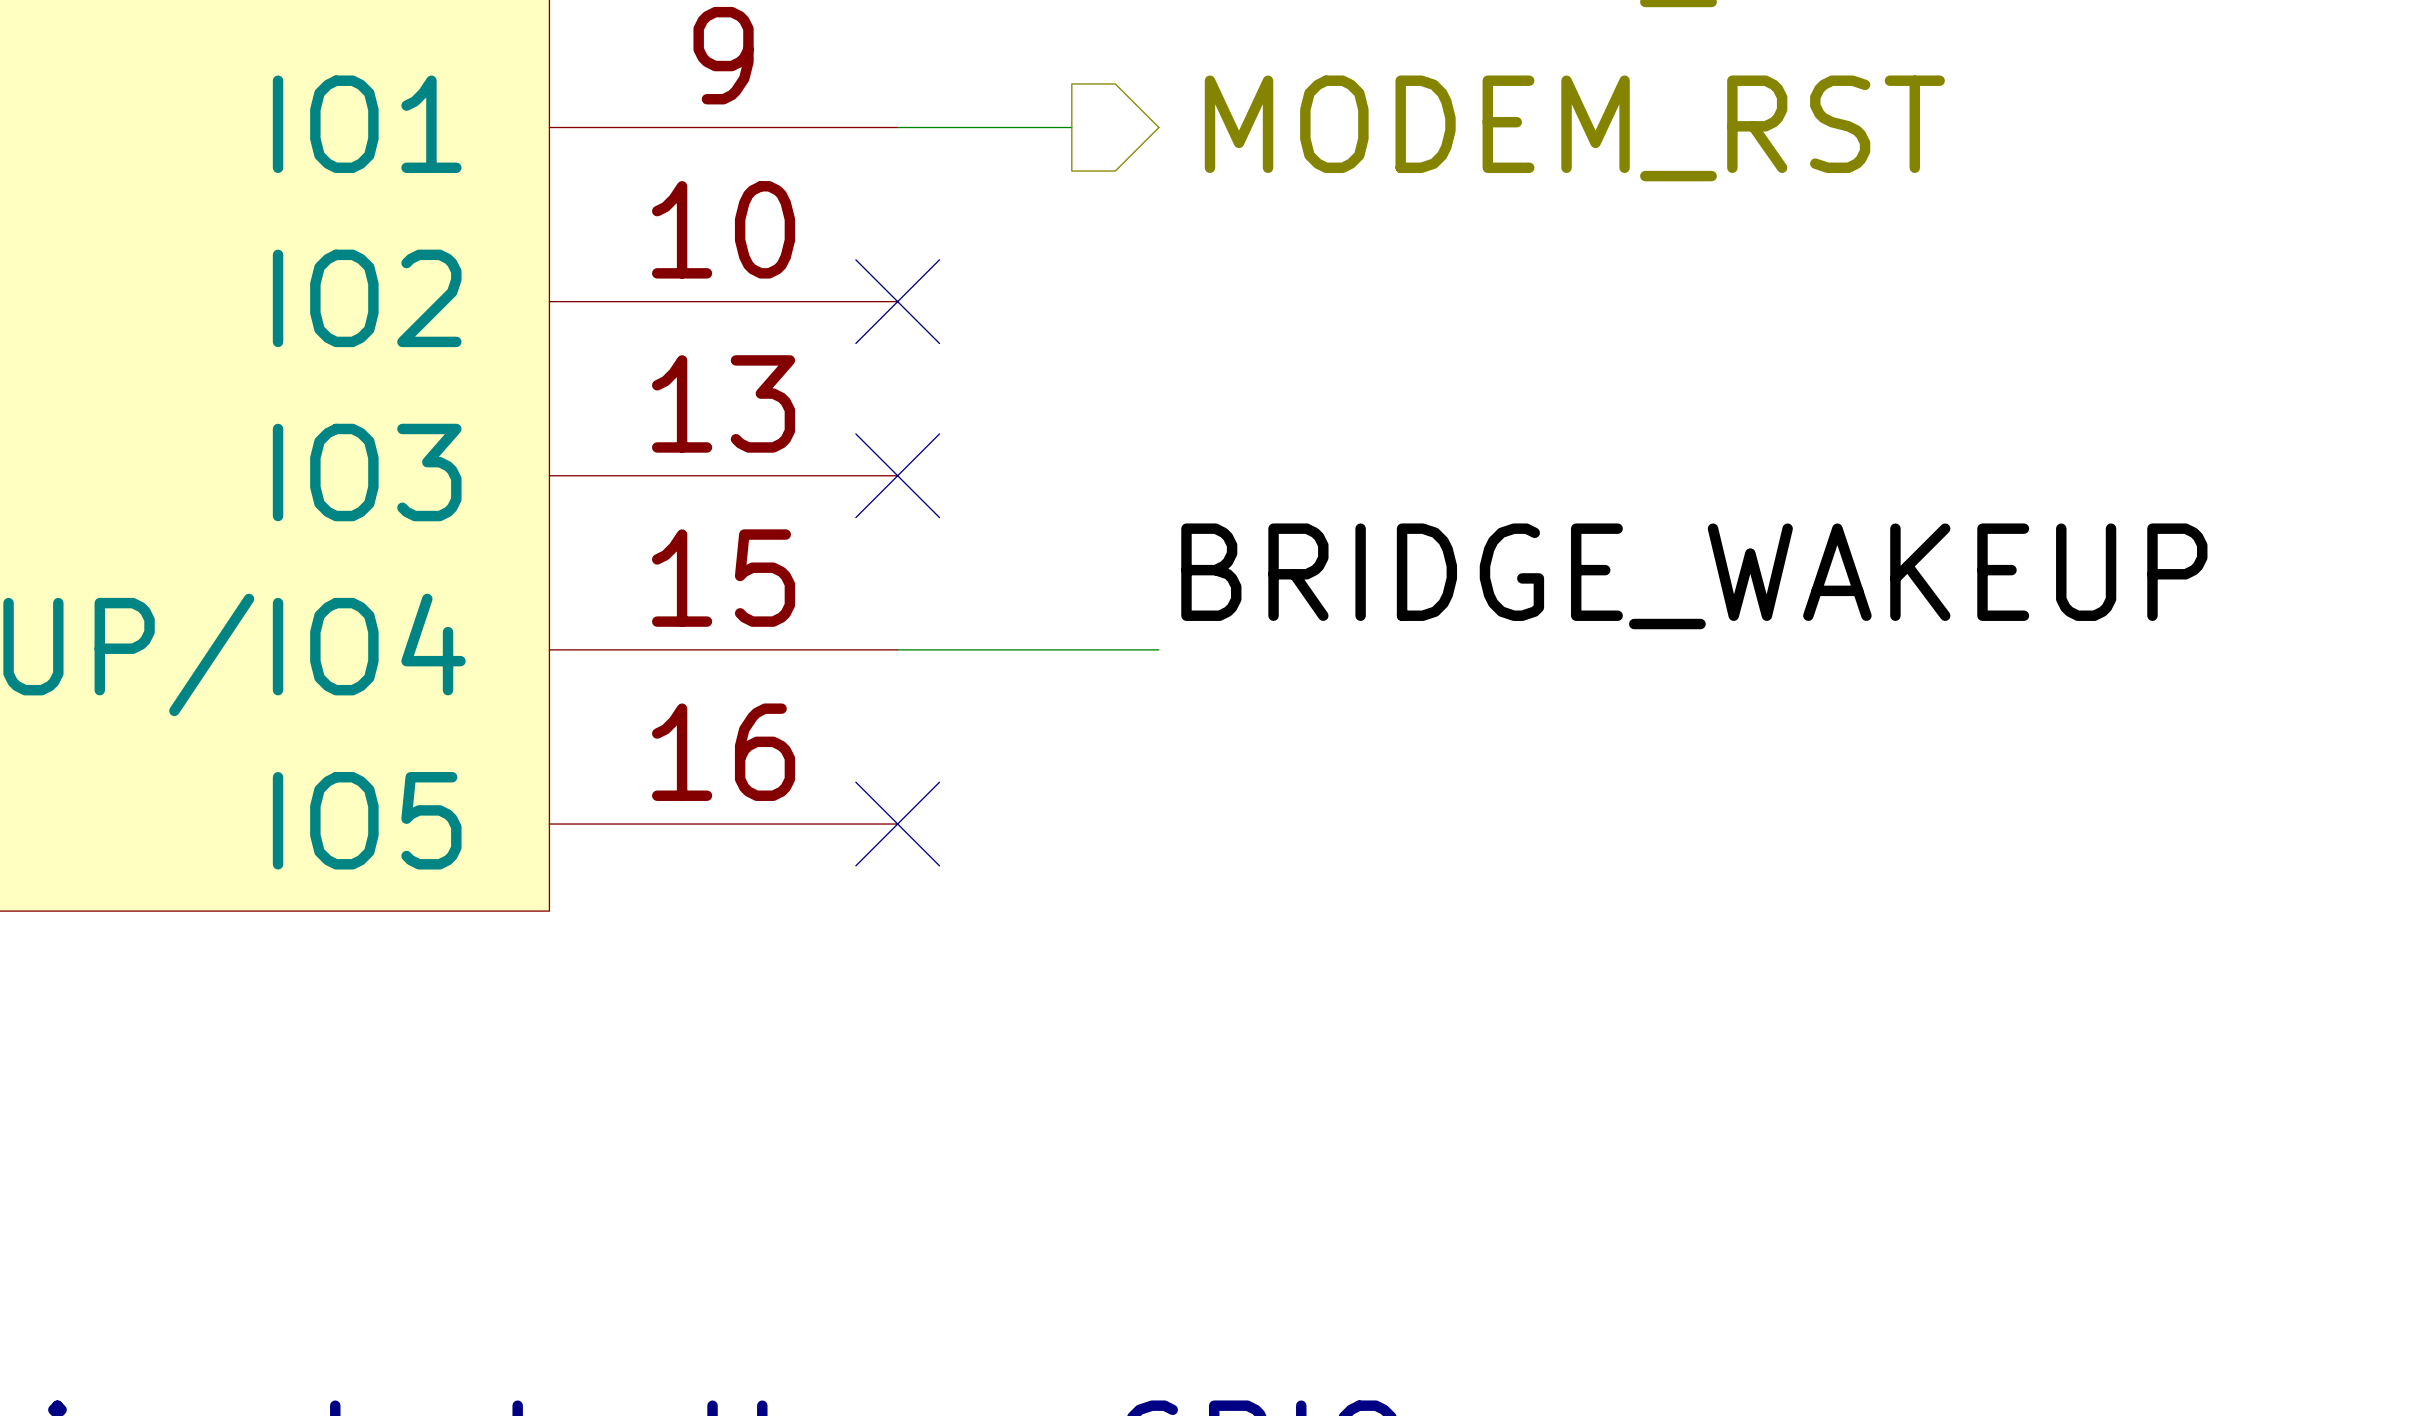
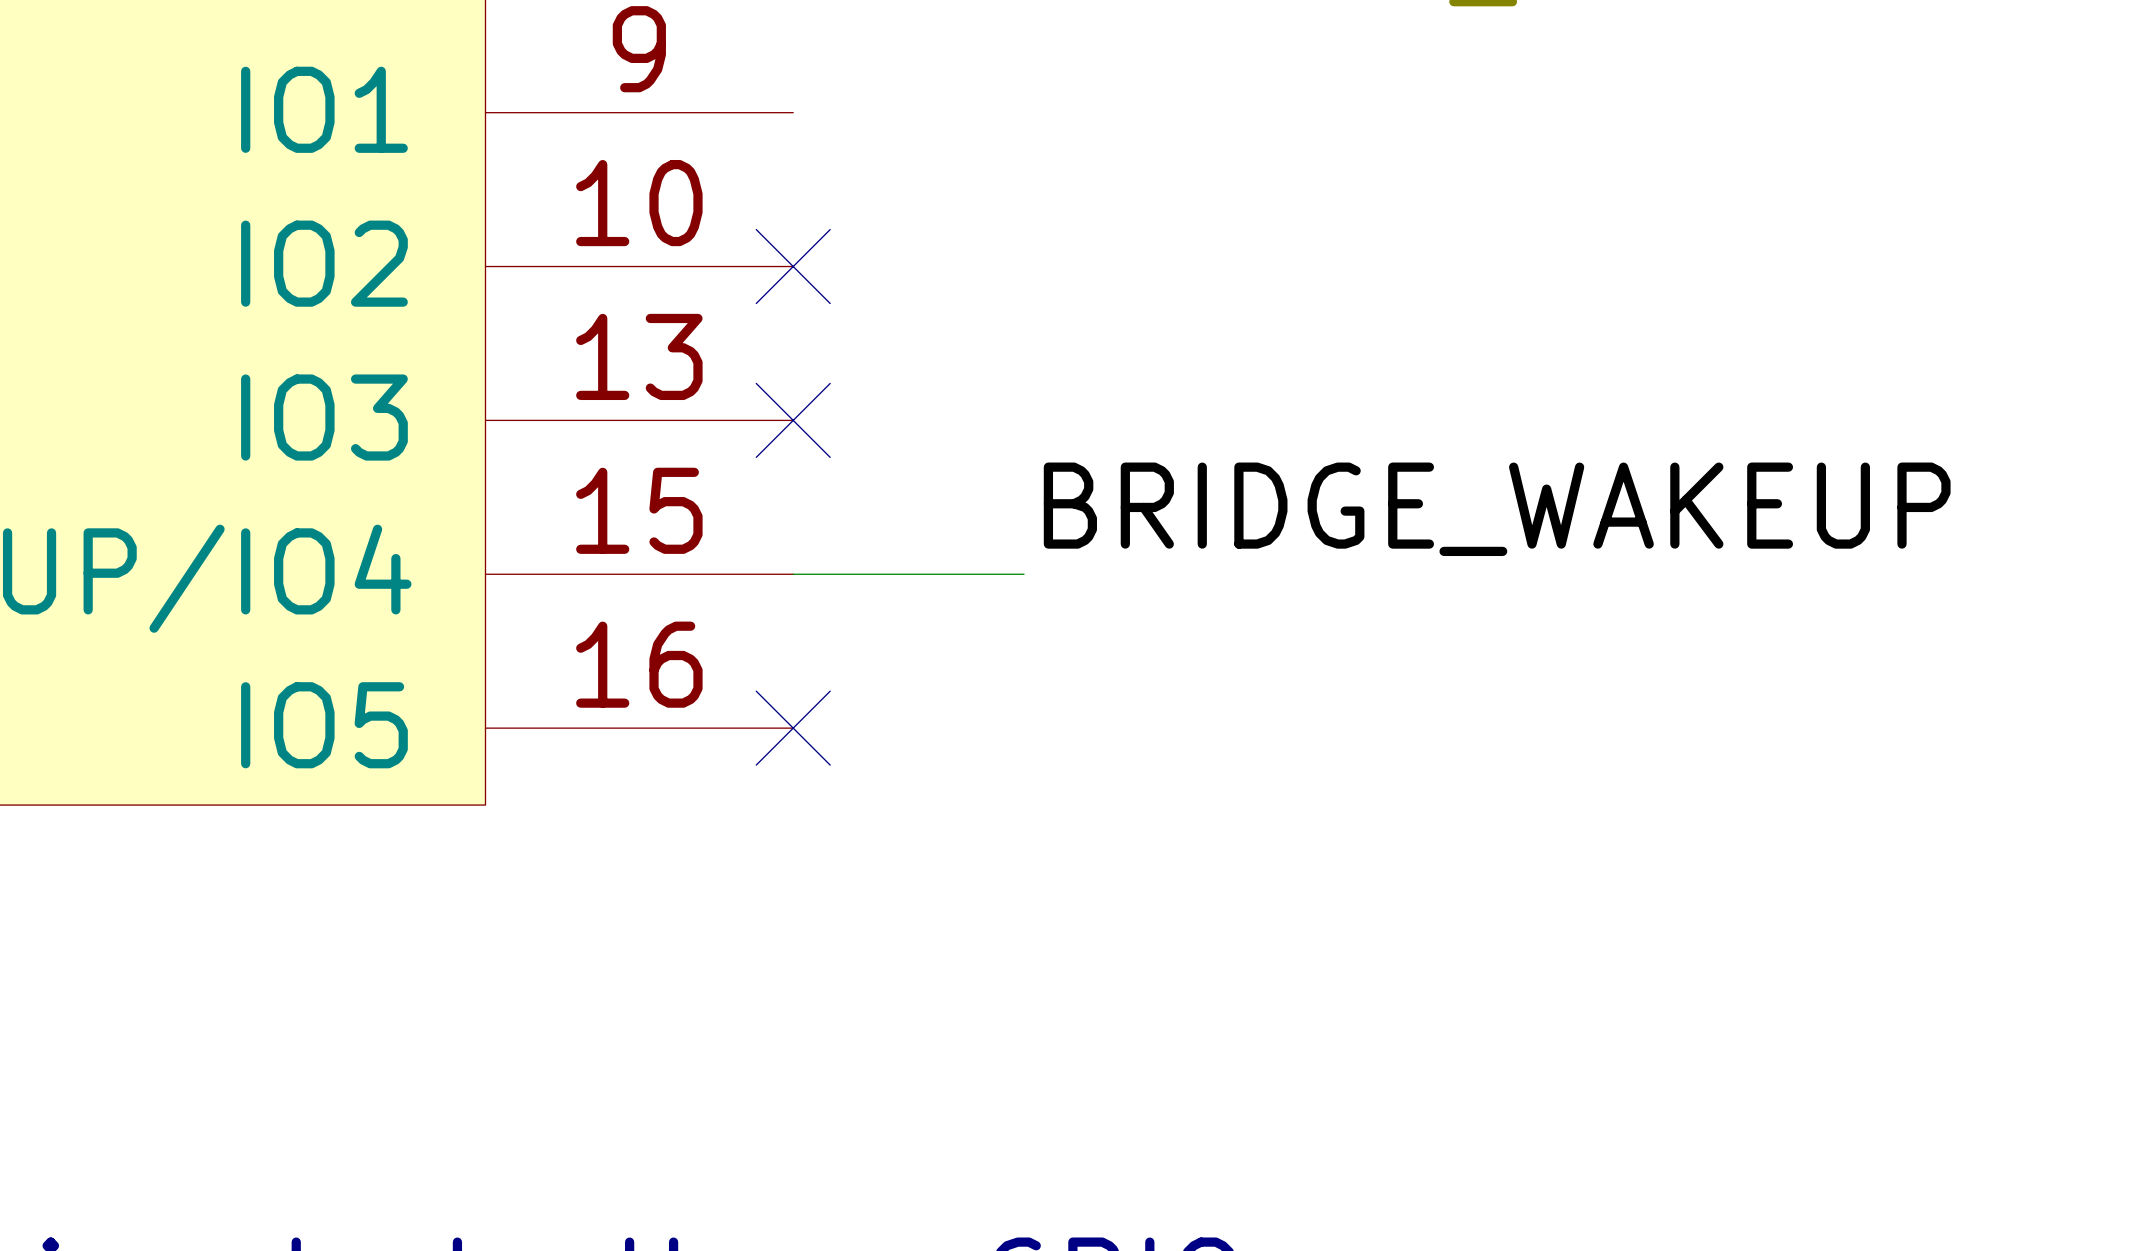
wire: (897, 127) (1071, 127) -> none
hierarchical label: MODEM_RST (1574, 128) -> none

